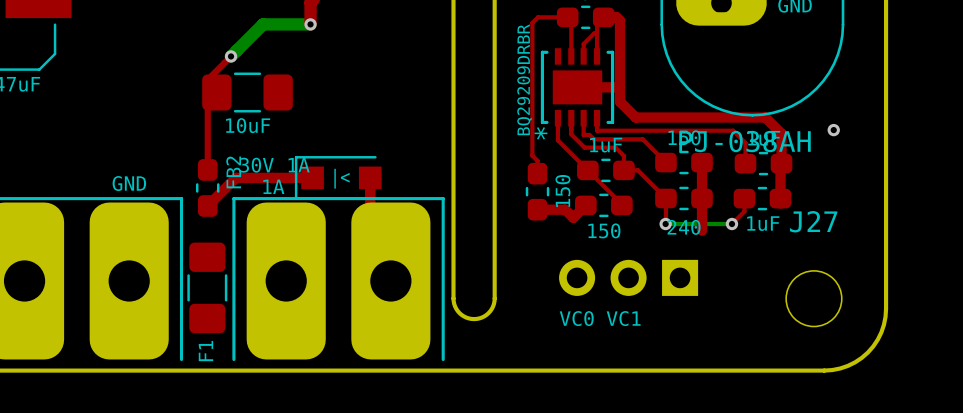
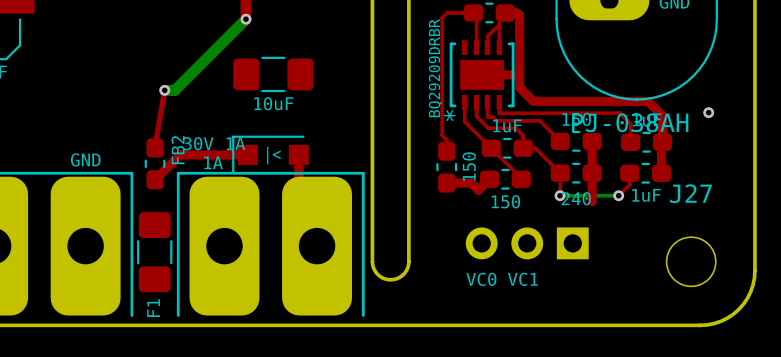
bottom track: (310, 24) (263, 24) (231, 56) -> (246, 19) (174, 90) (164, 90)
top track: (231, 56) (207, 79) (207, 169) -> (164, 90) (154, 147)
via position: (231, 56) -> (164, 90)
part position: (247, 92) -> (273, 74)

